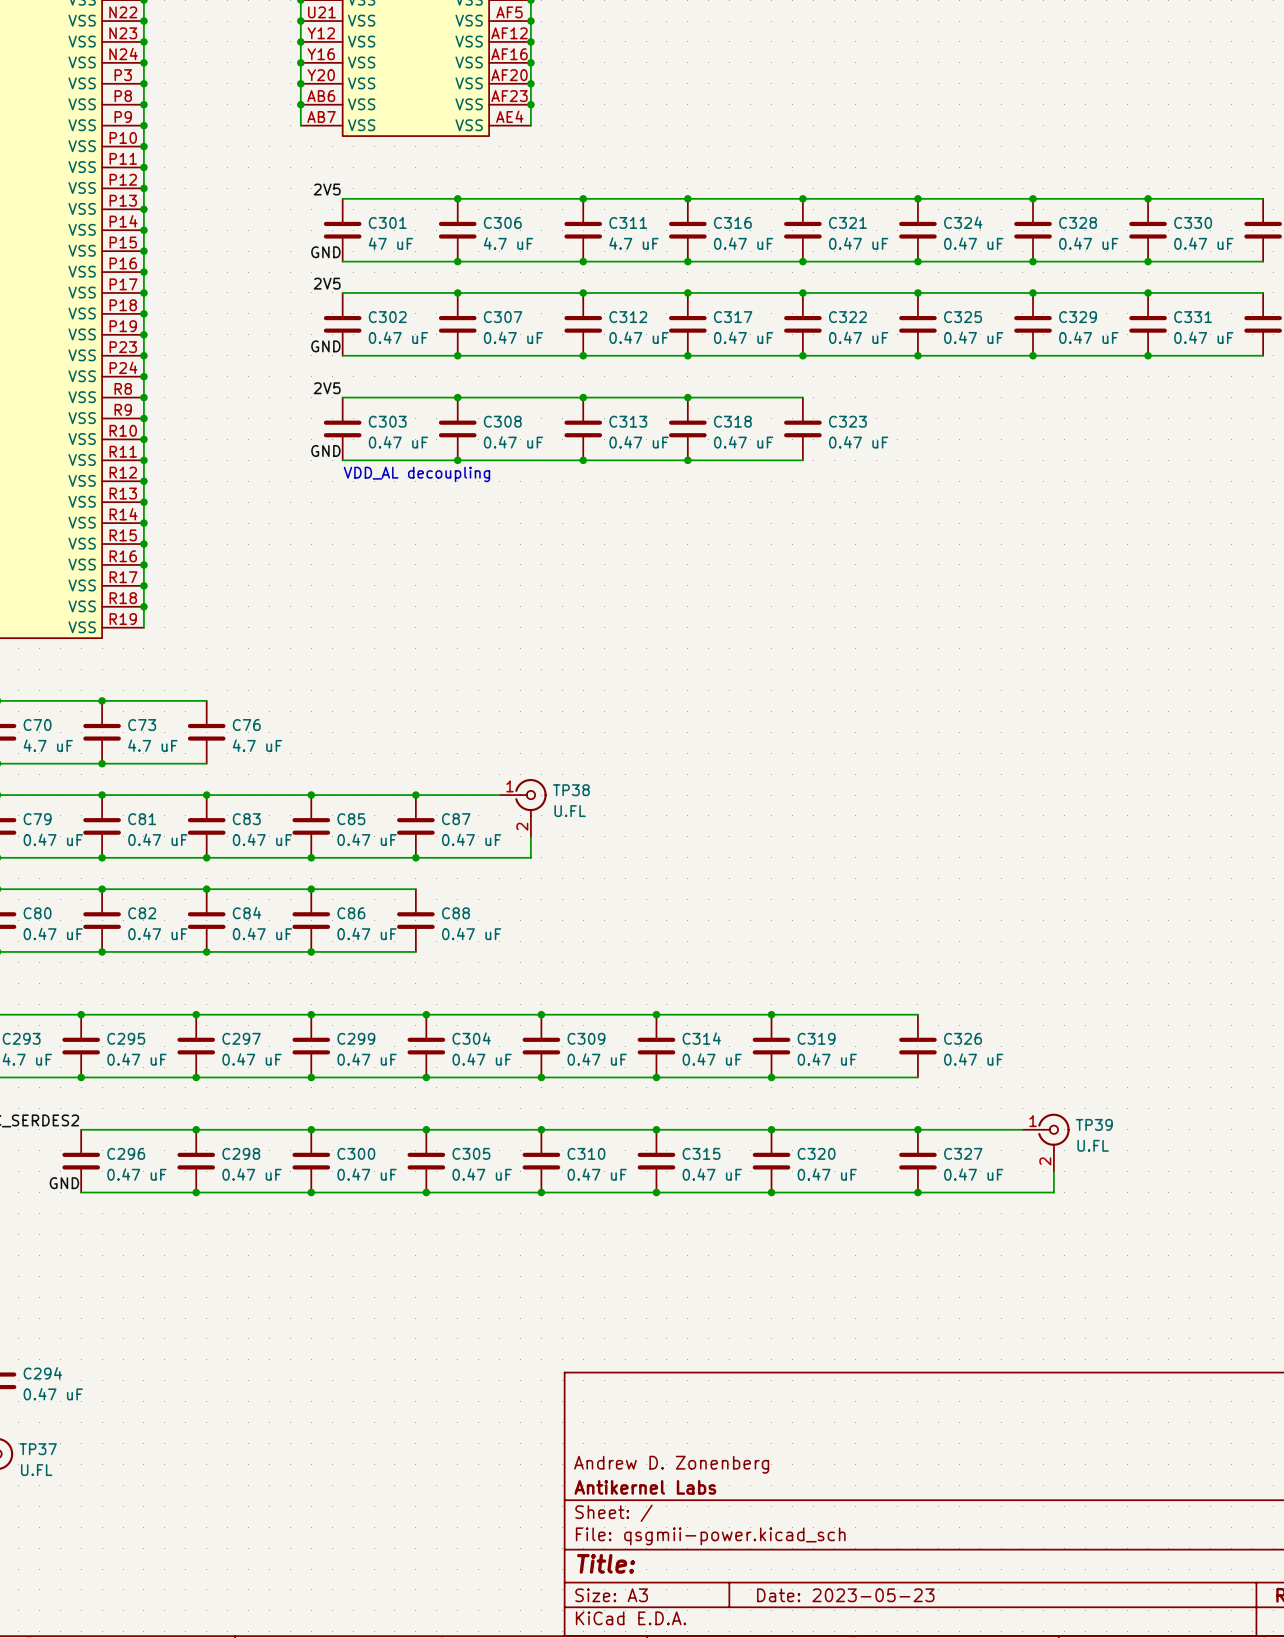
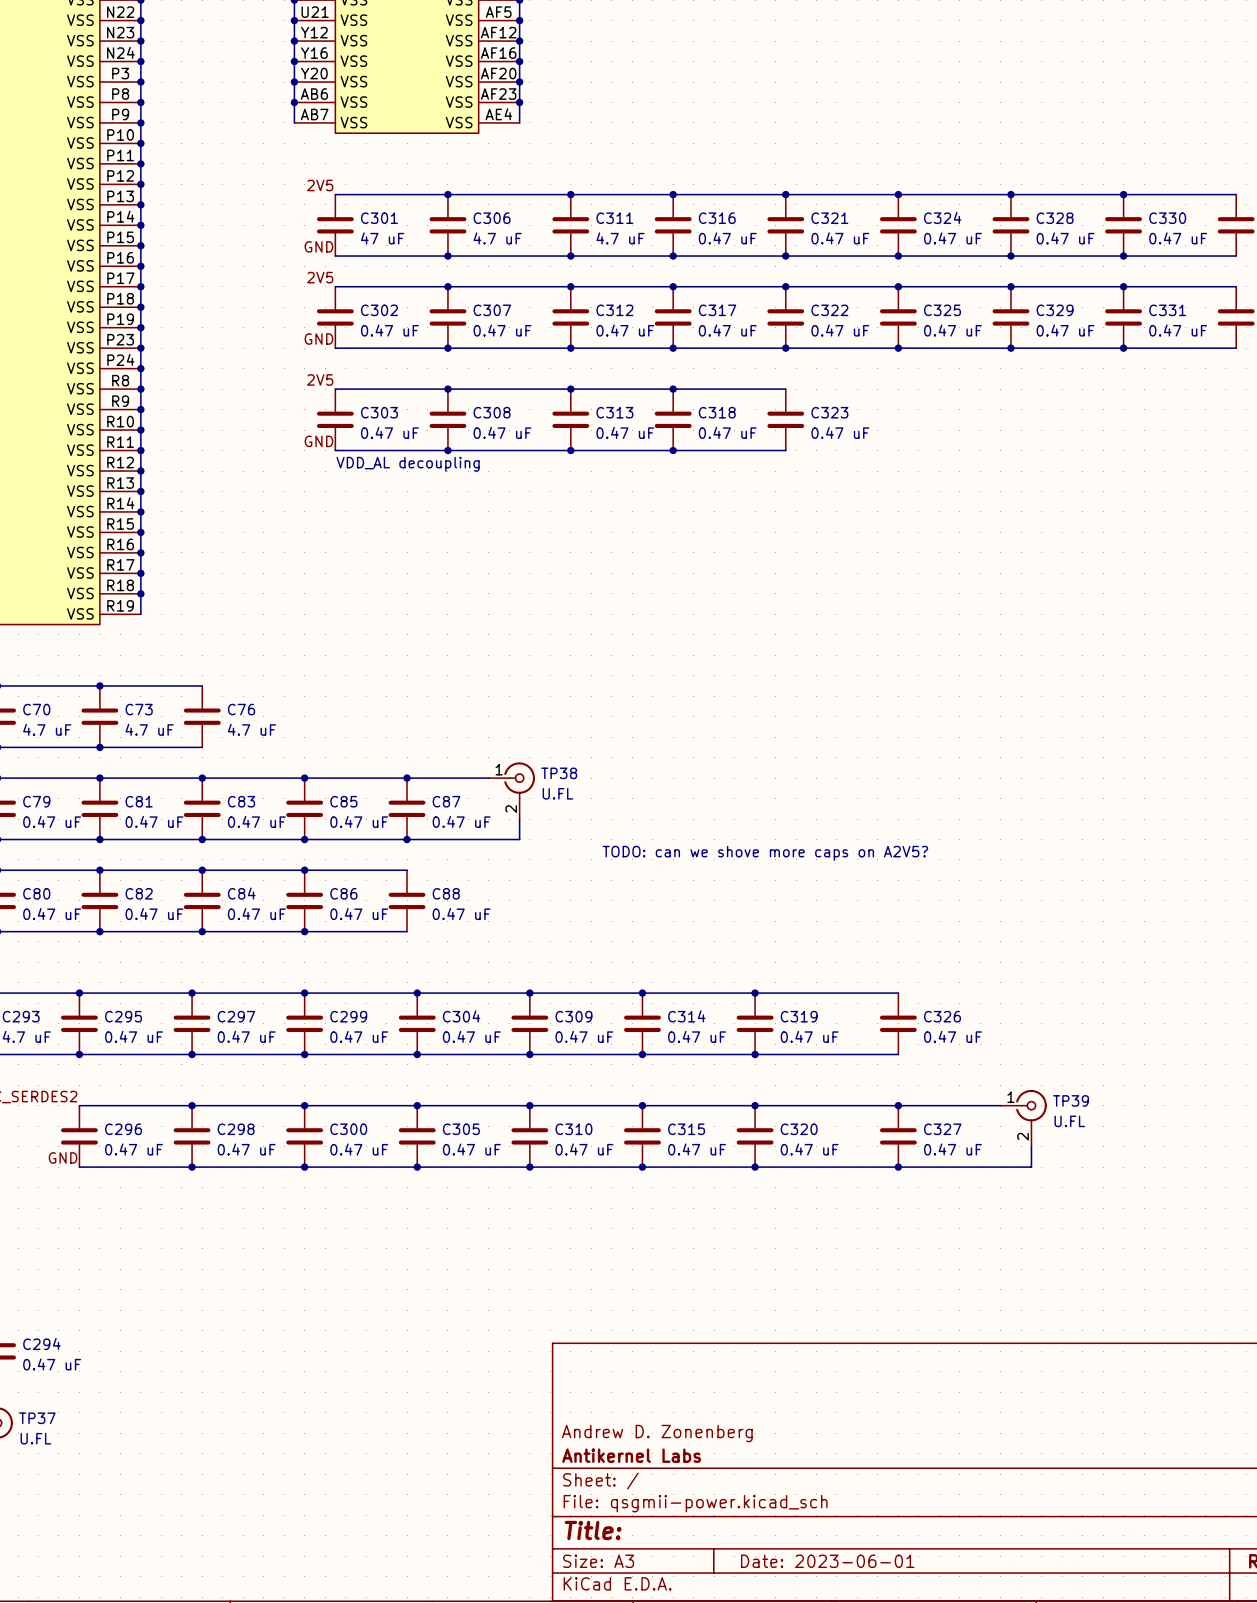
text: none -> TODO: can we shove more caps on A2V5? (765, 853)
title block: Date: 2023-05-23 (845, 1595) -> Date: 2023-06-01 (827, 1561)

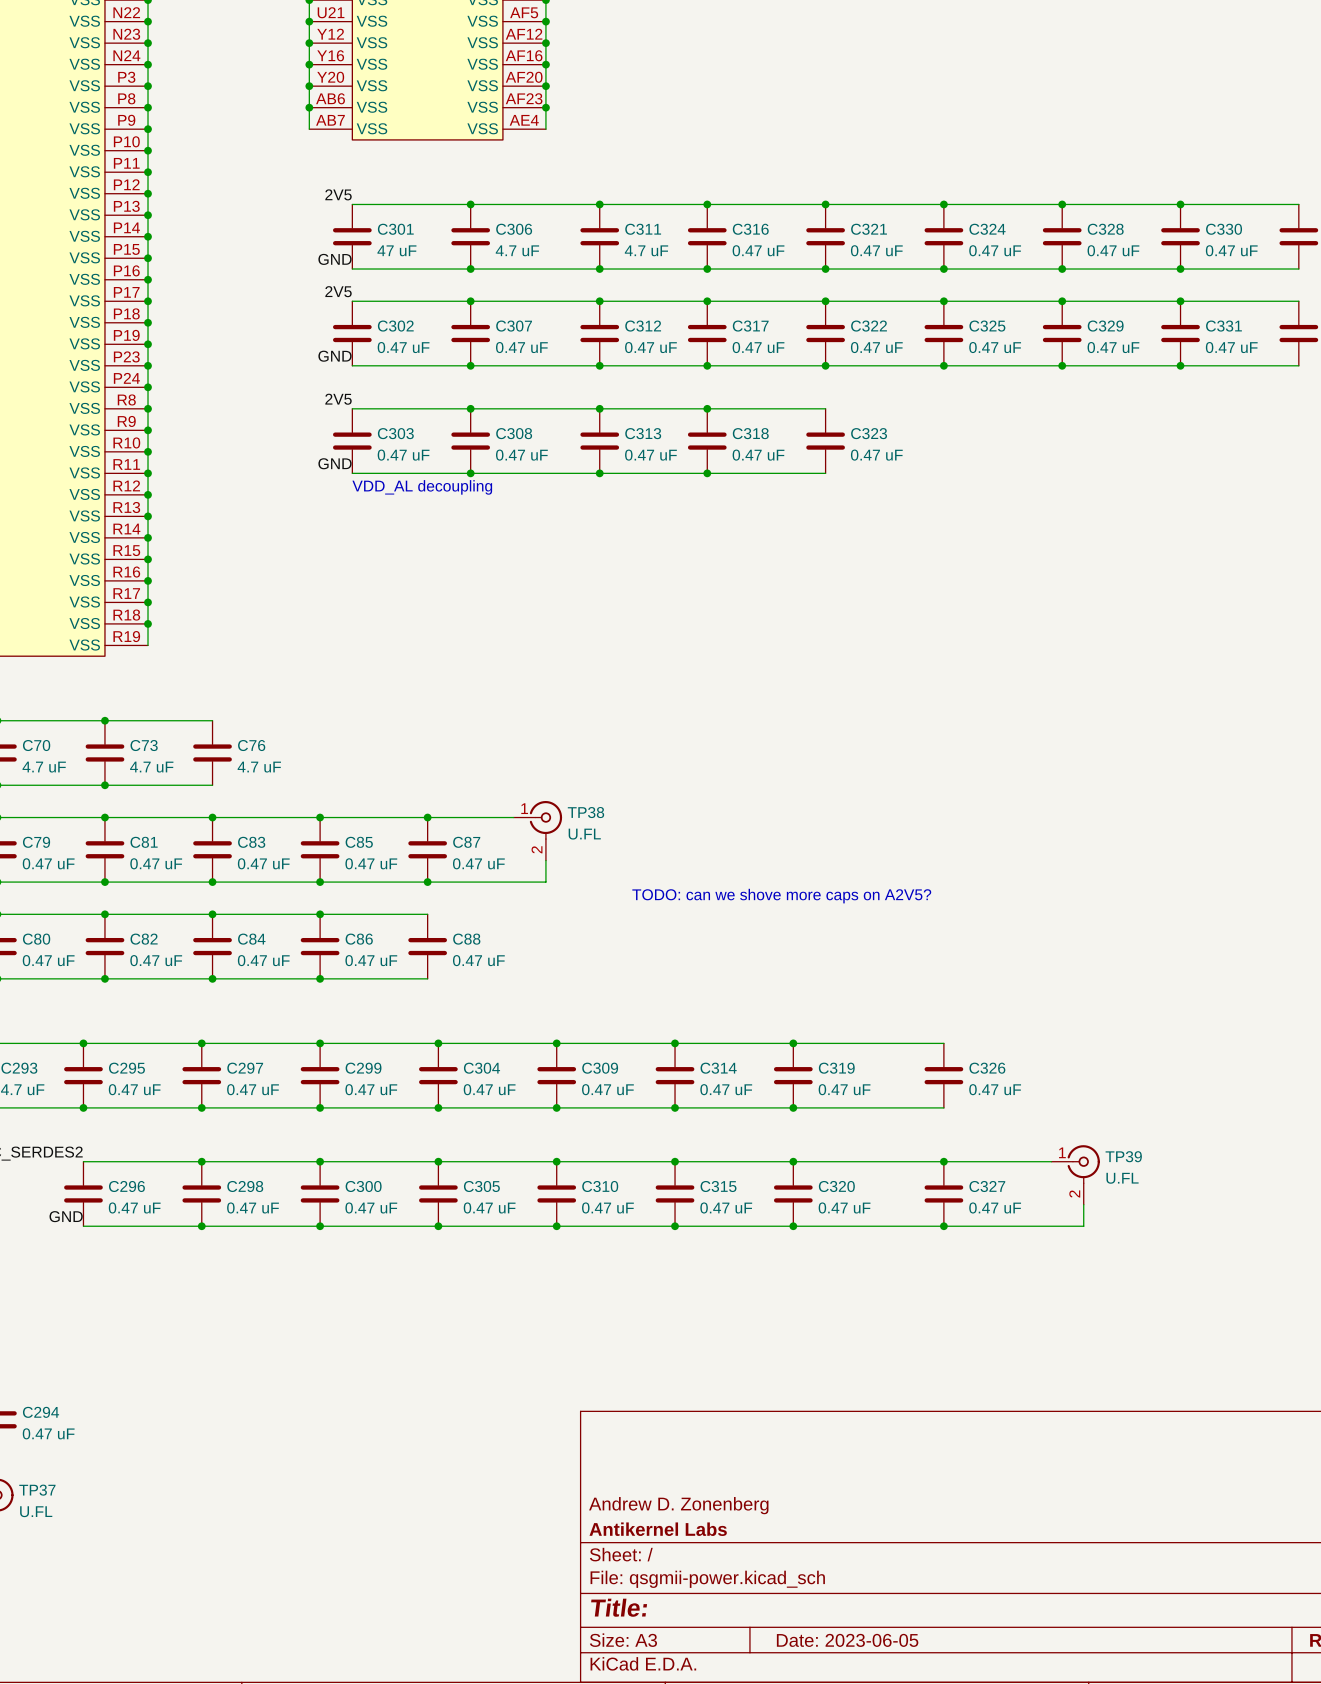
title block: Date: 2023-06-01 (827, 1561) -> Date: 2023-06-05 (847, 1640)

